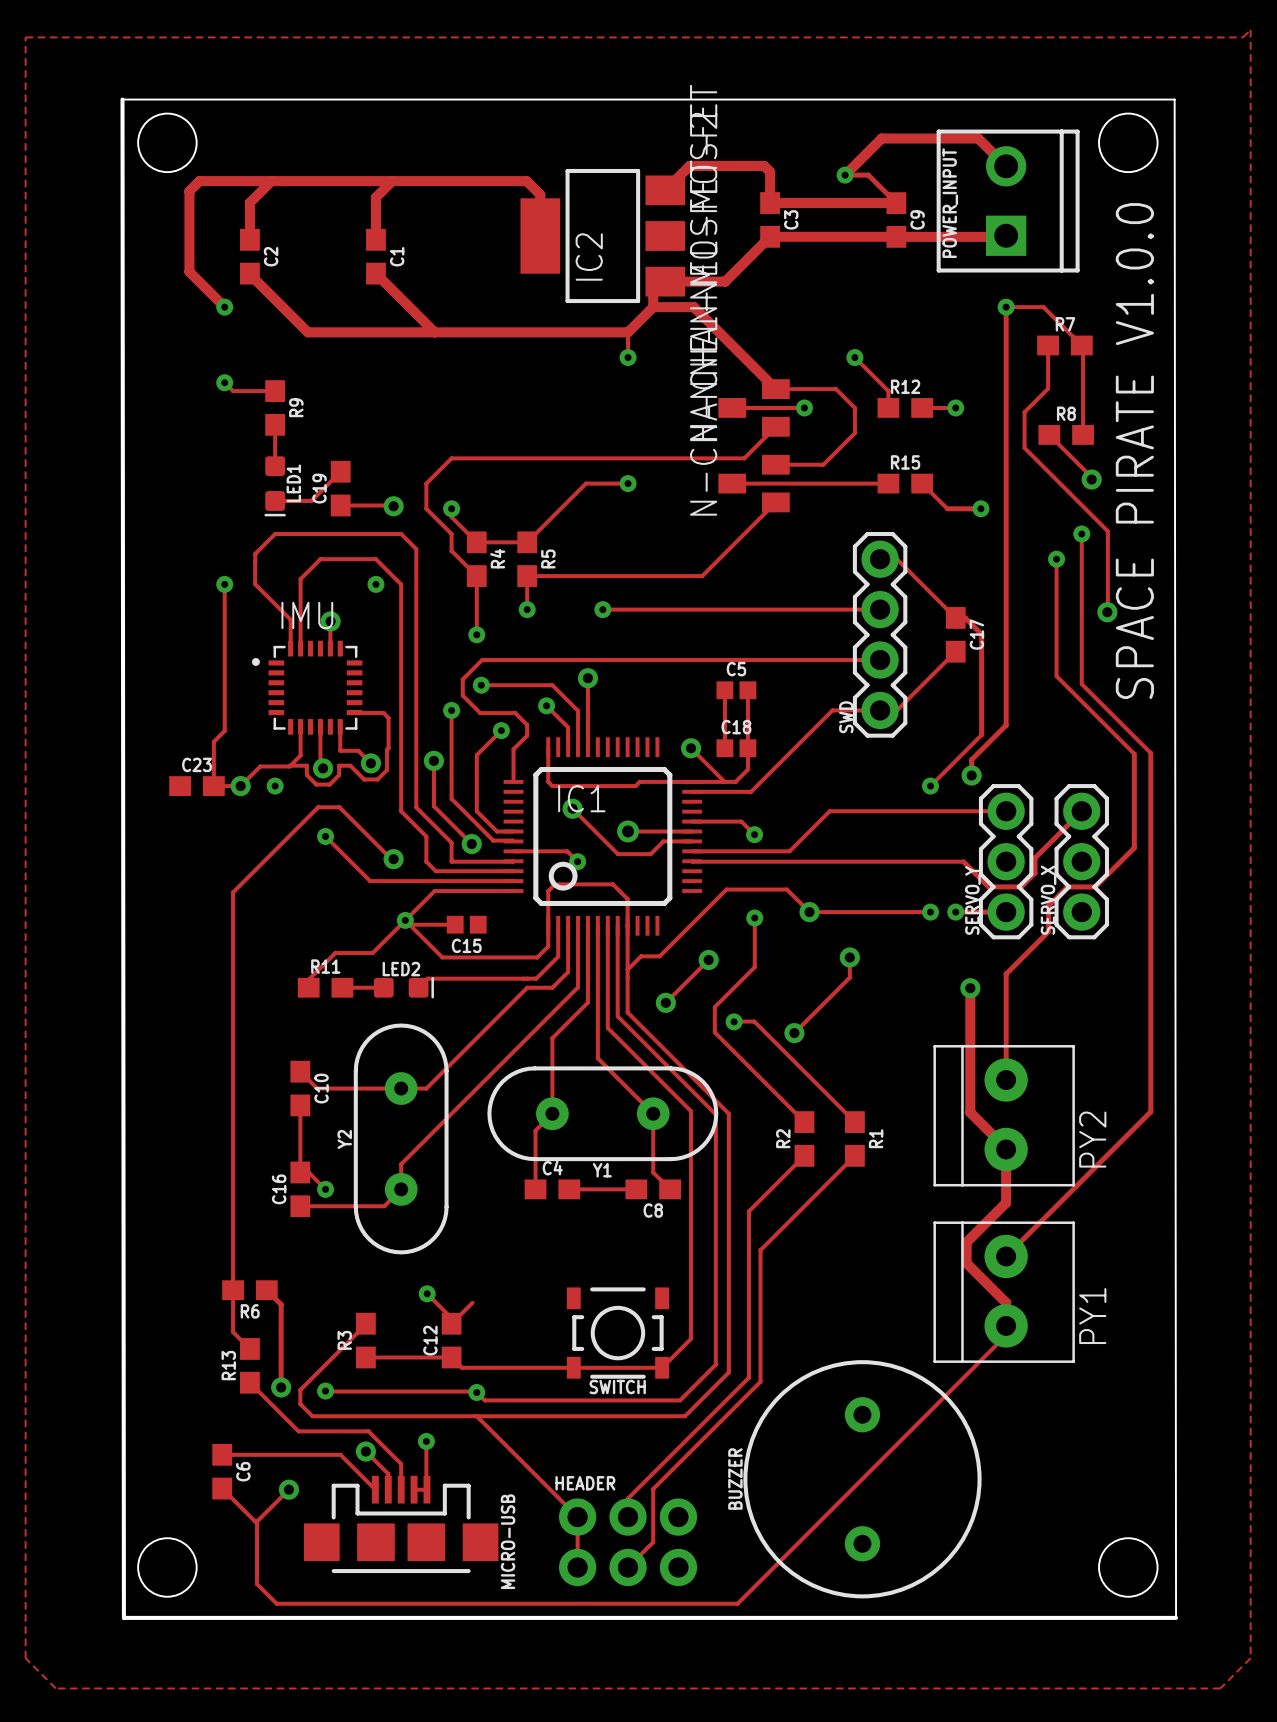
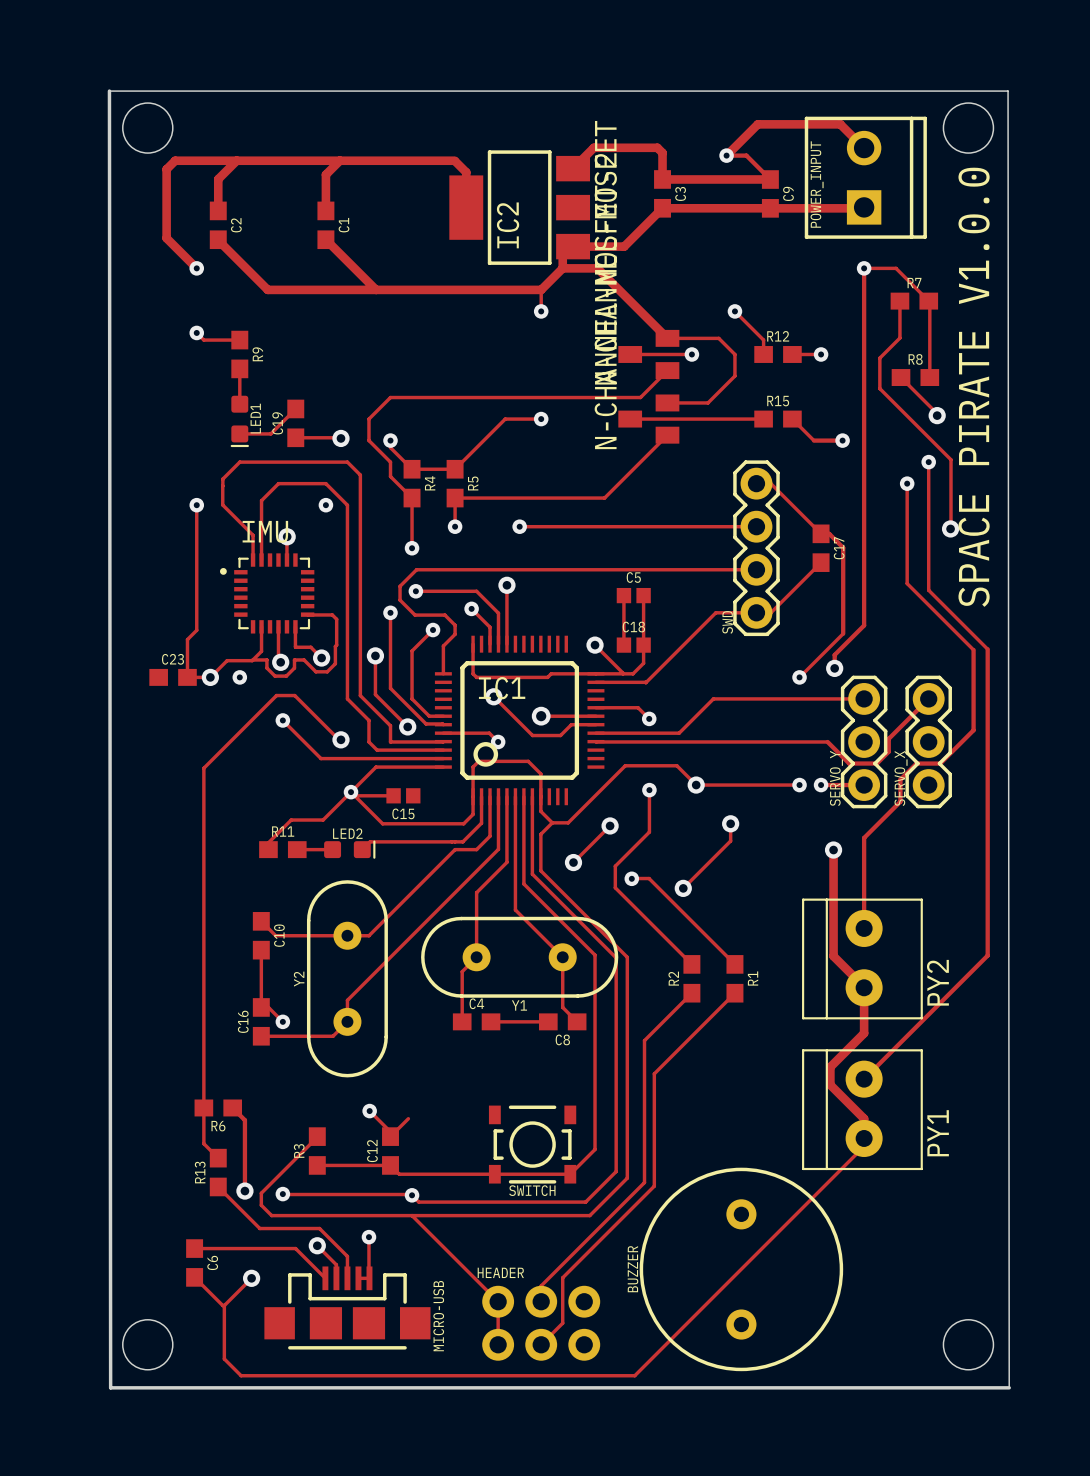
zone outline: (1250, 29) (1243, 37) (25, 37) (25, 1658) (55, 1688) (1220, 1688) (1250, 1658) (1250, 29) -> none
track: (627, 942) (627, 969) -> (540, 811) (552, 822)

